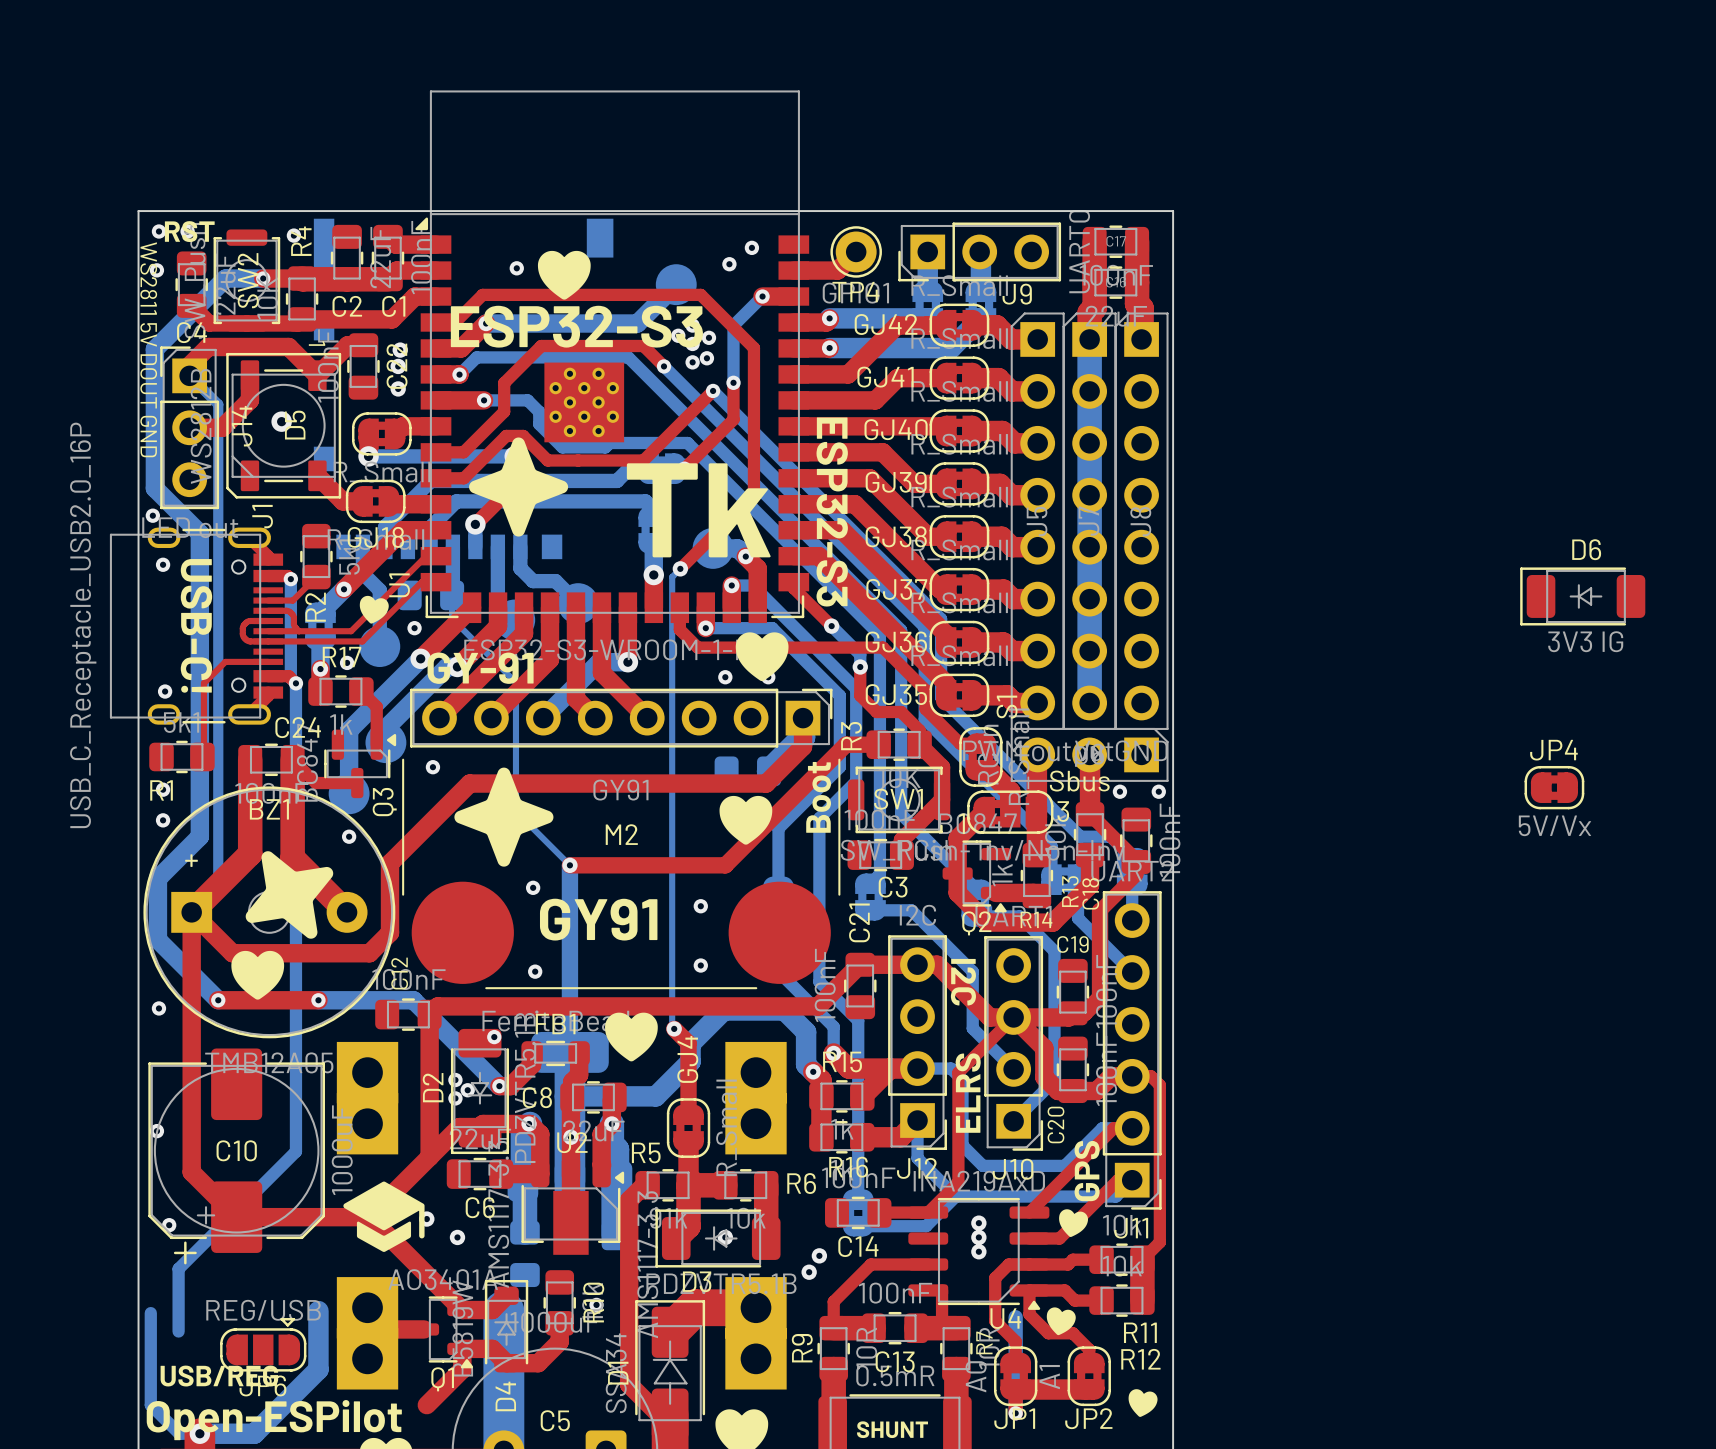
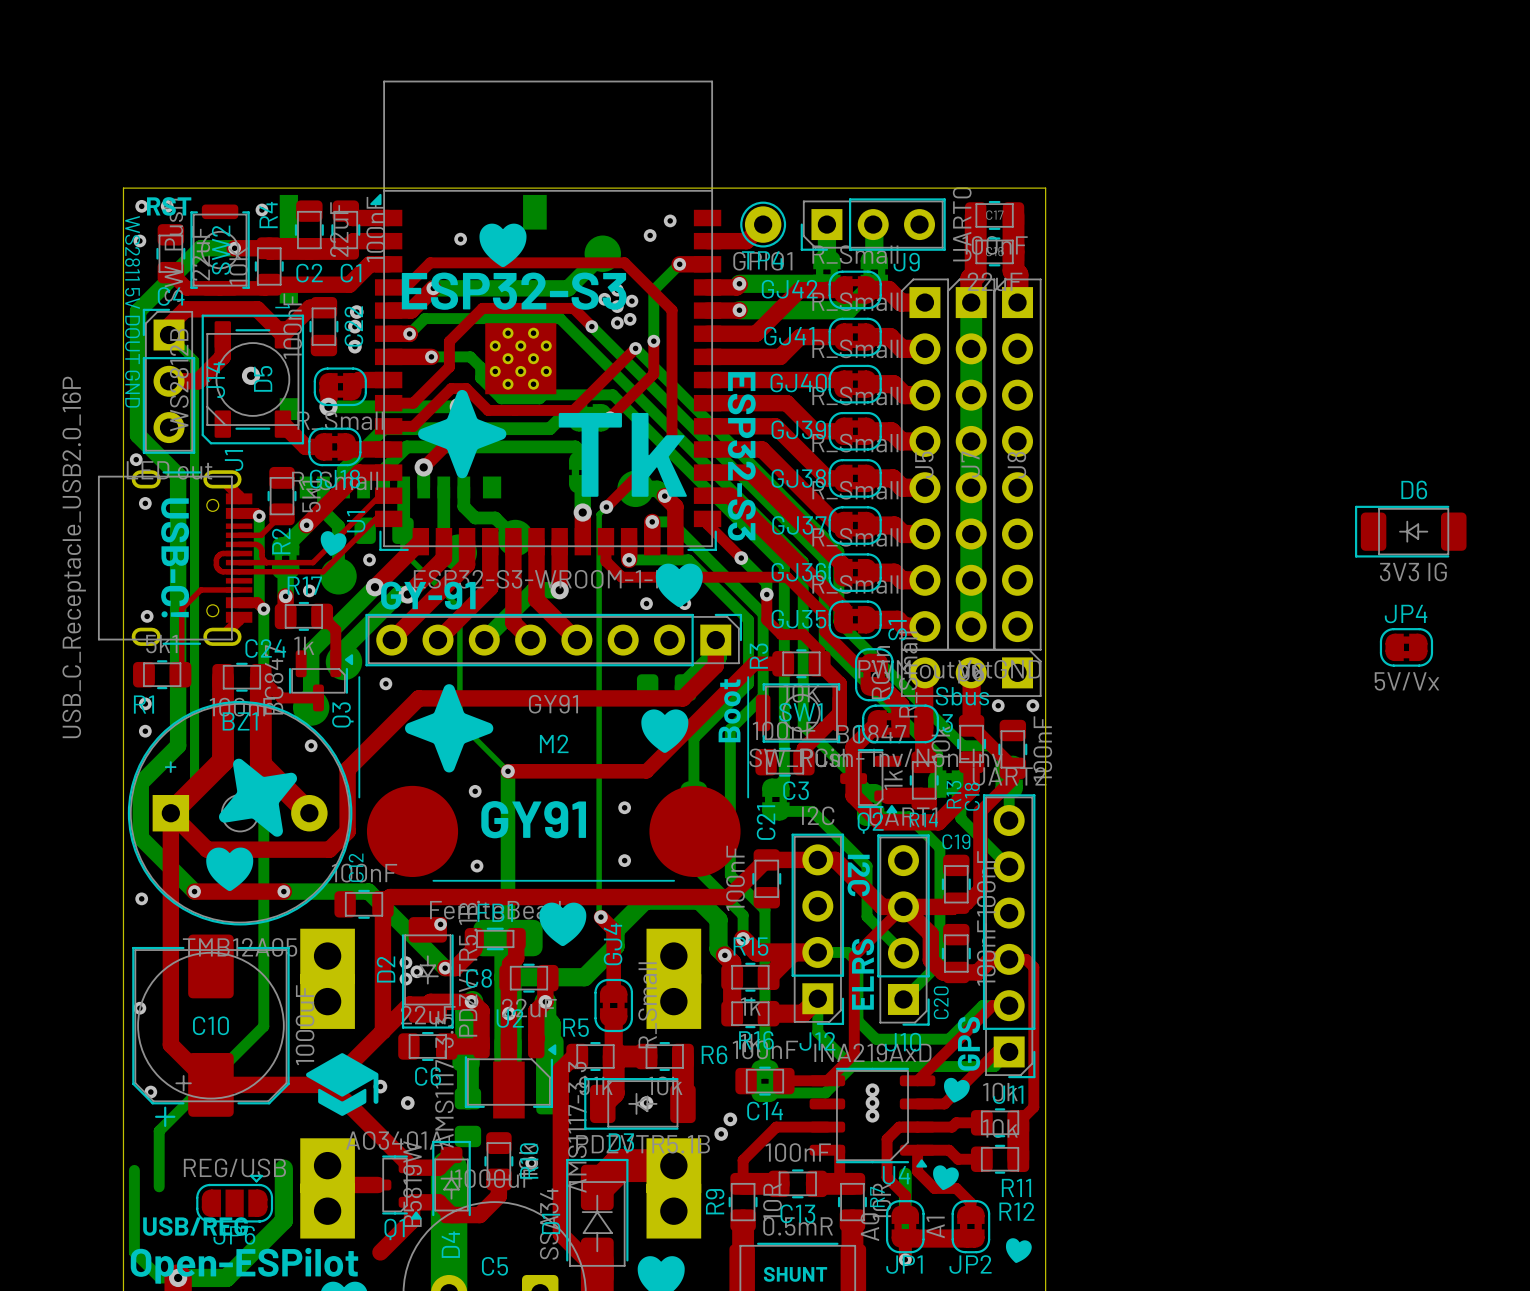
JP4 position: (1554, 787) -> (1406, 647)

